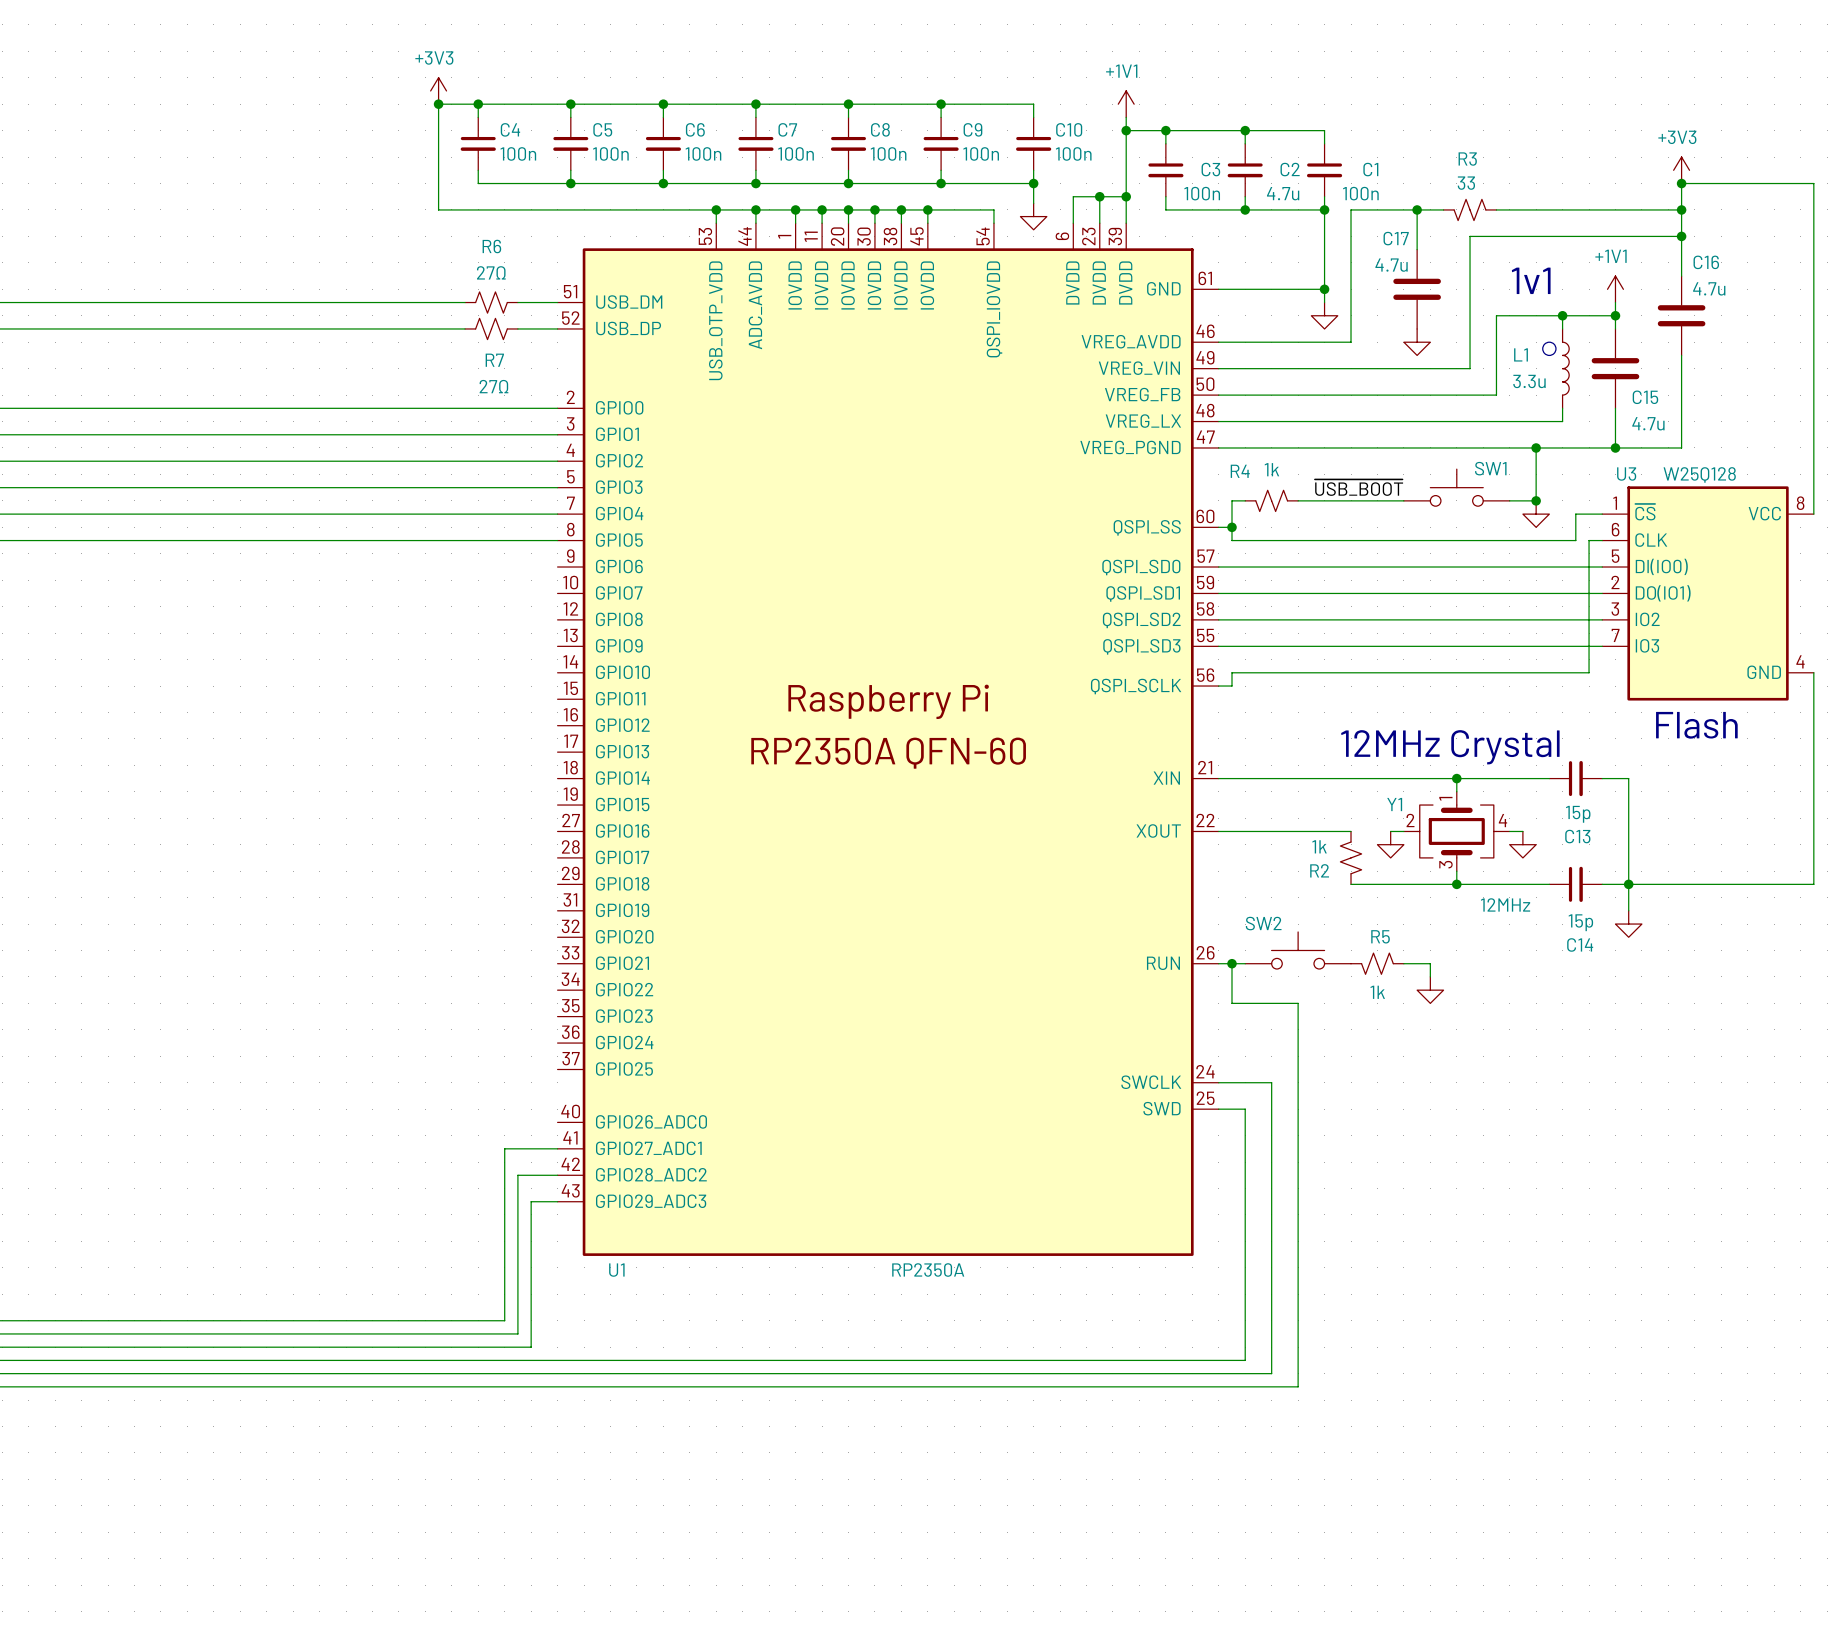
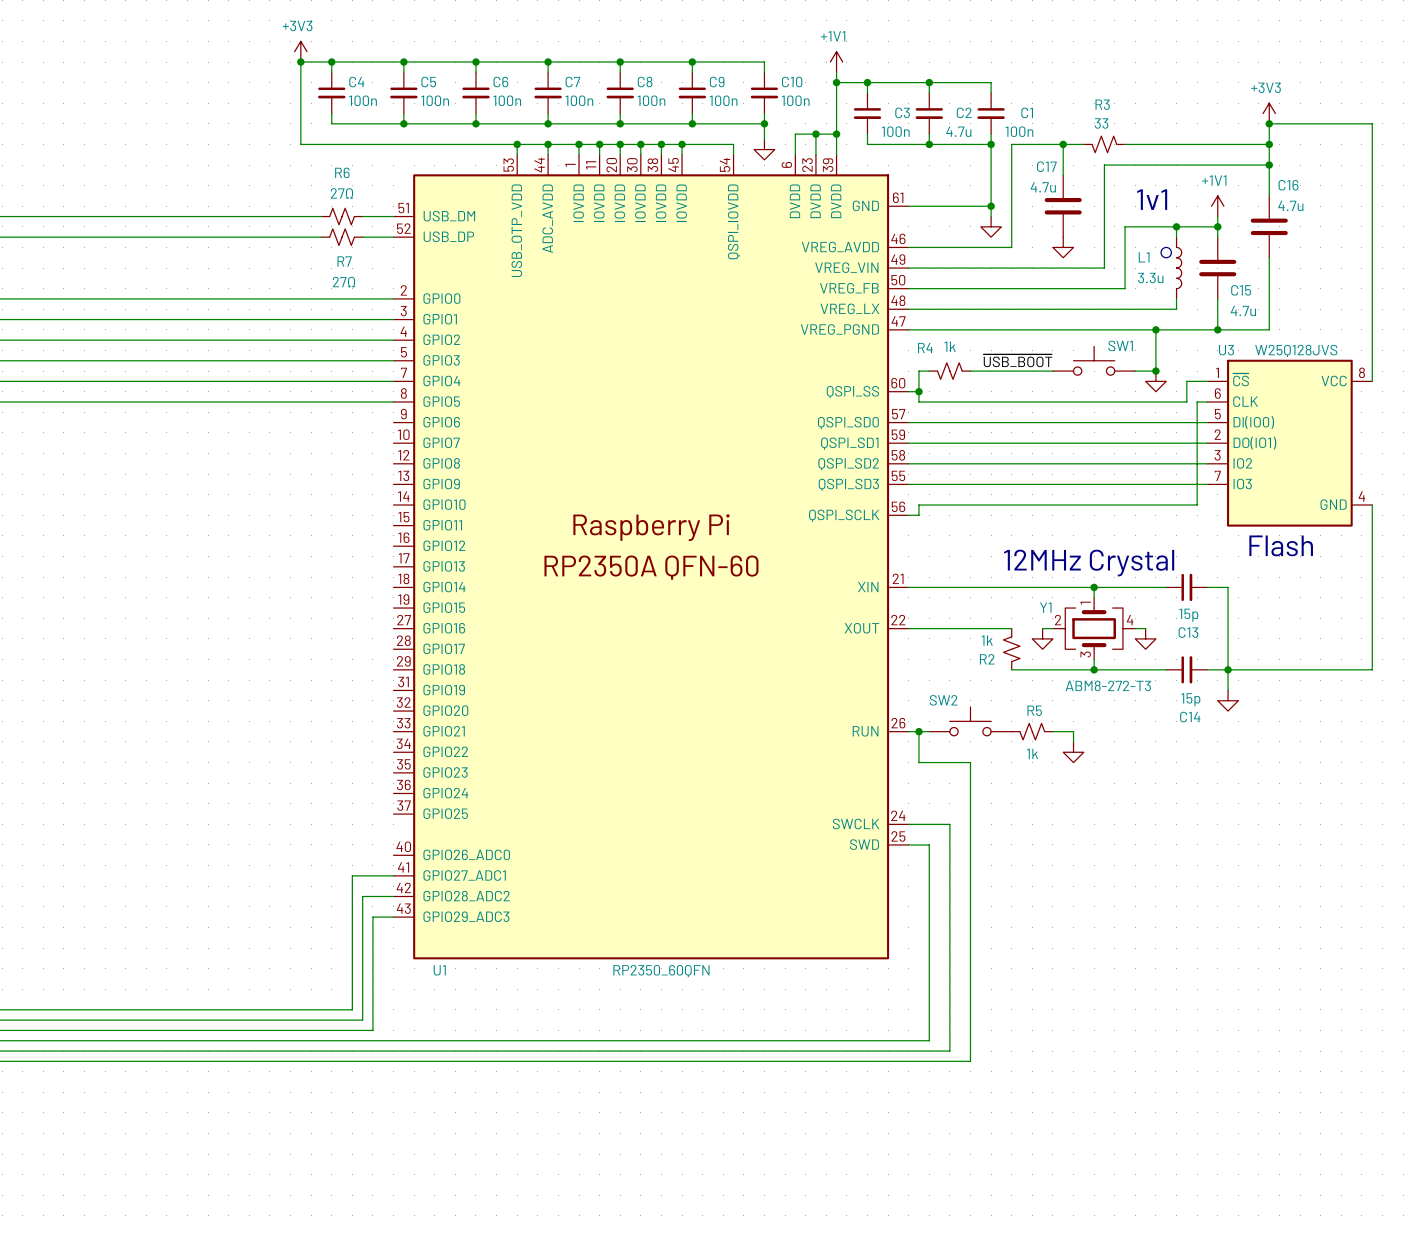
U3 value: W25Q128 (1699, 474) -> W25Q128JVS (1296, 350)
Y1 value: 12MHz (1505, 904) -> ABM8-272-T3 (1108, 685)
U1 value: RP2350A (928, 1270) -> RP2350_60QFN (661, 971)

